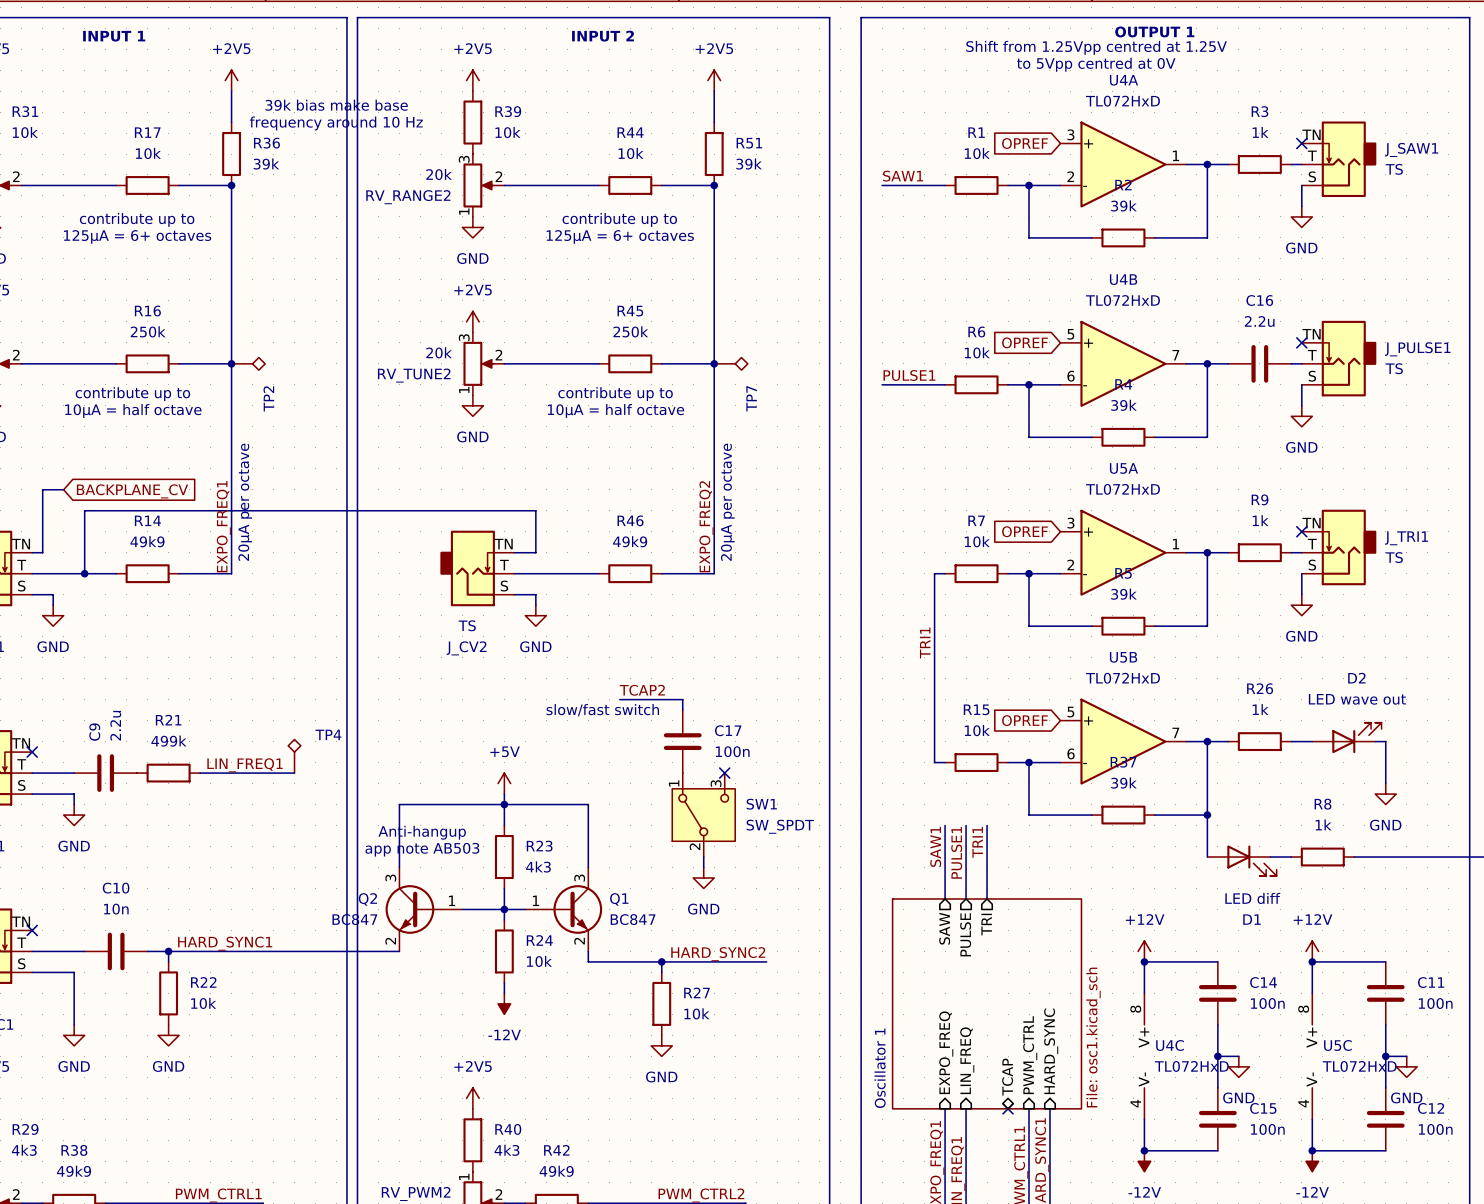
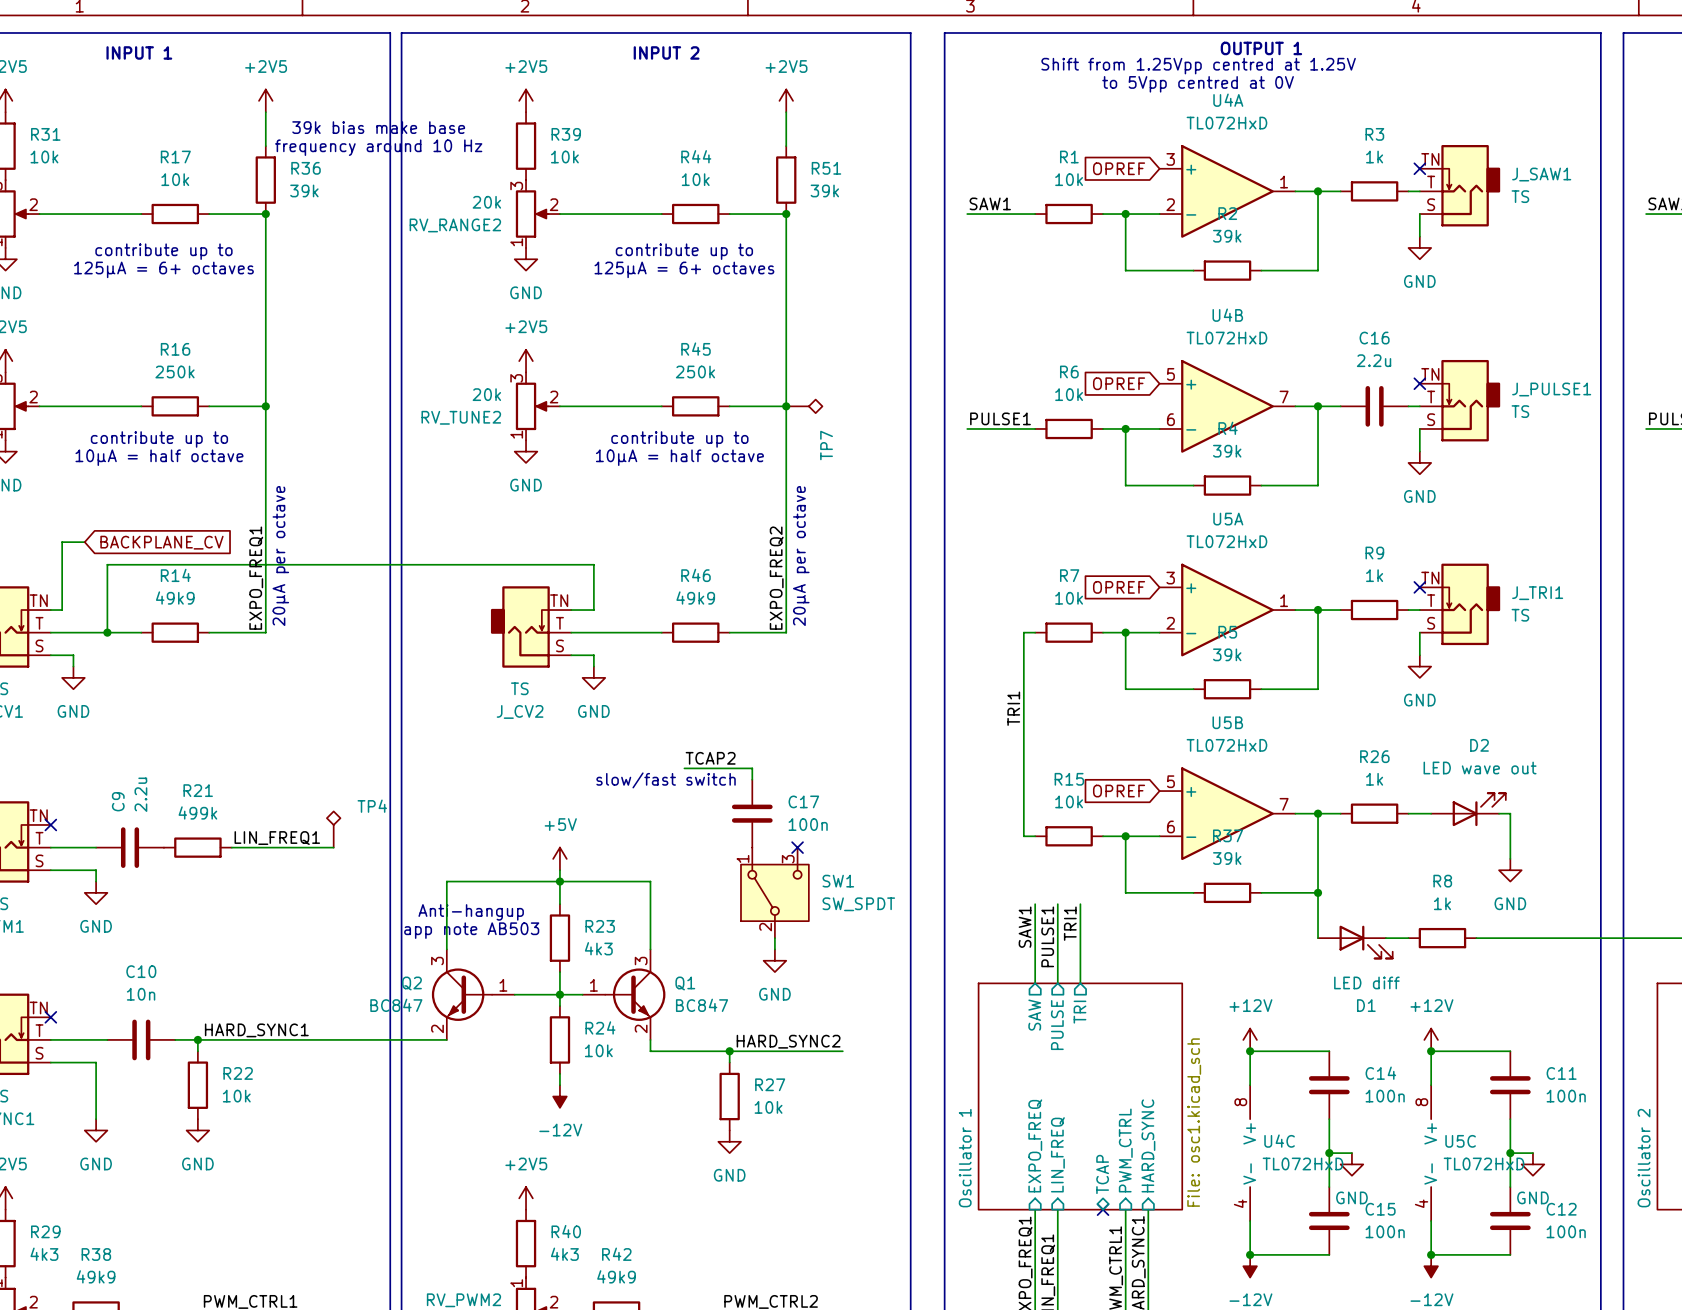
TP2: (248, 363) -> none

